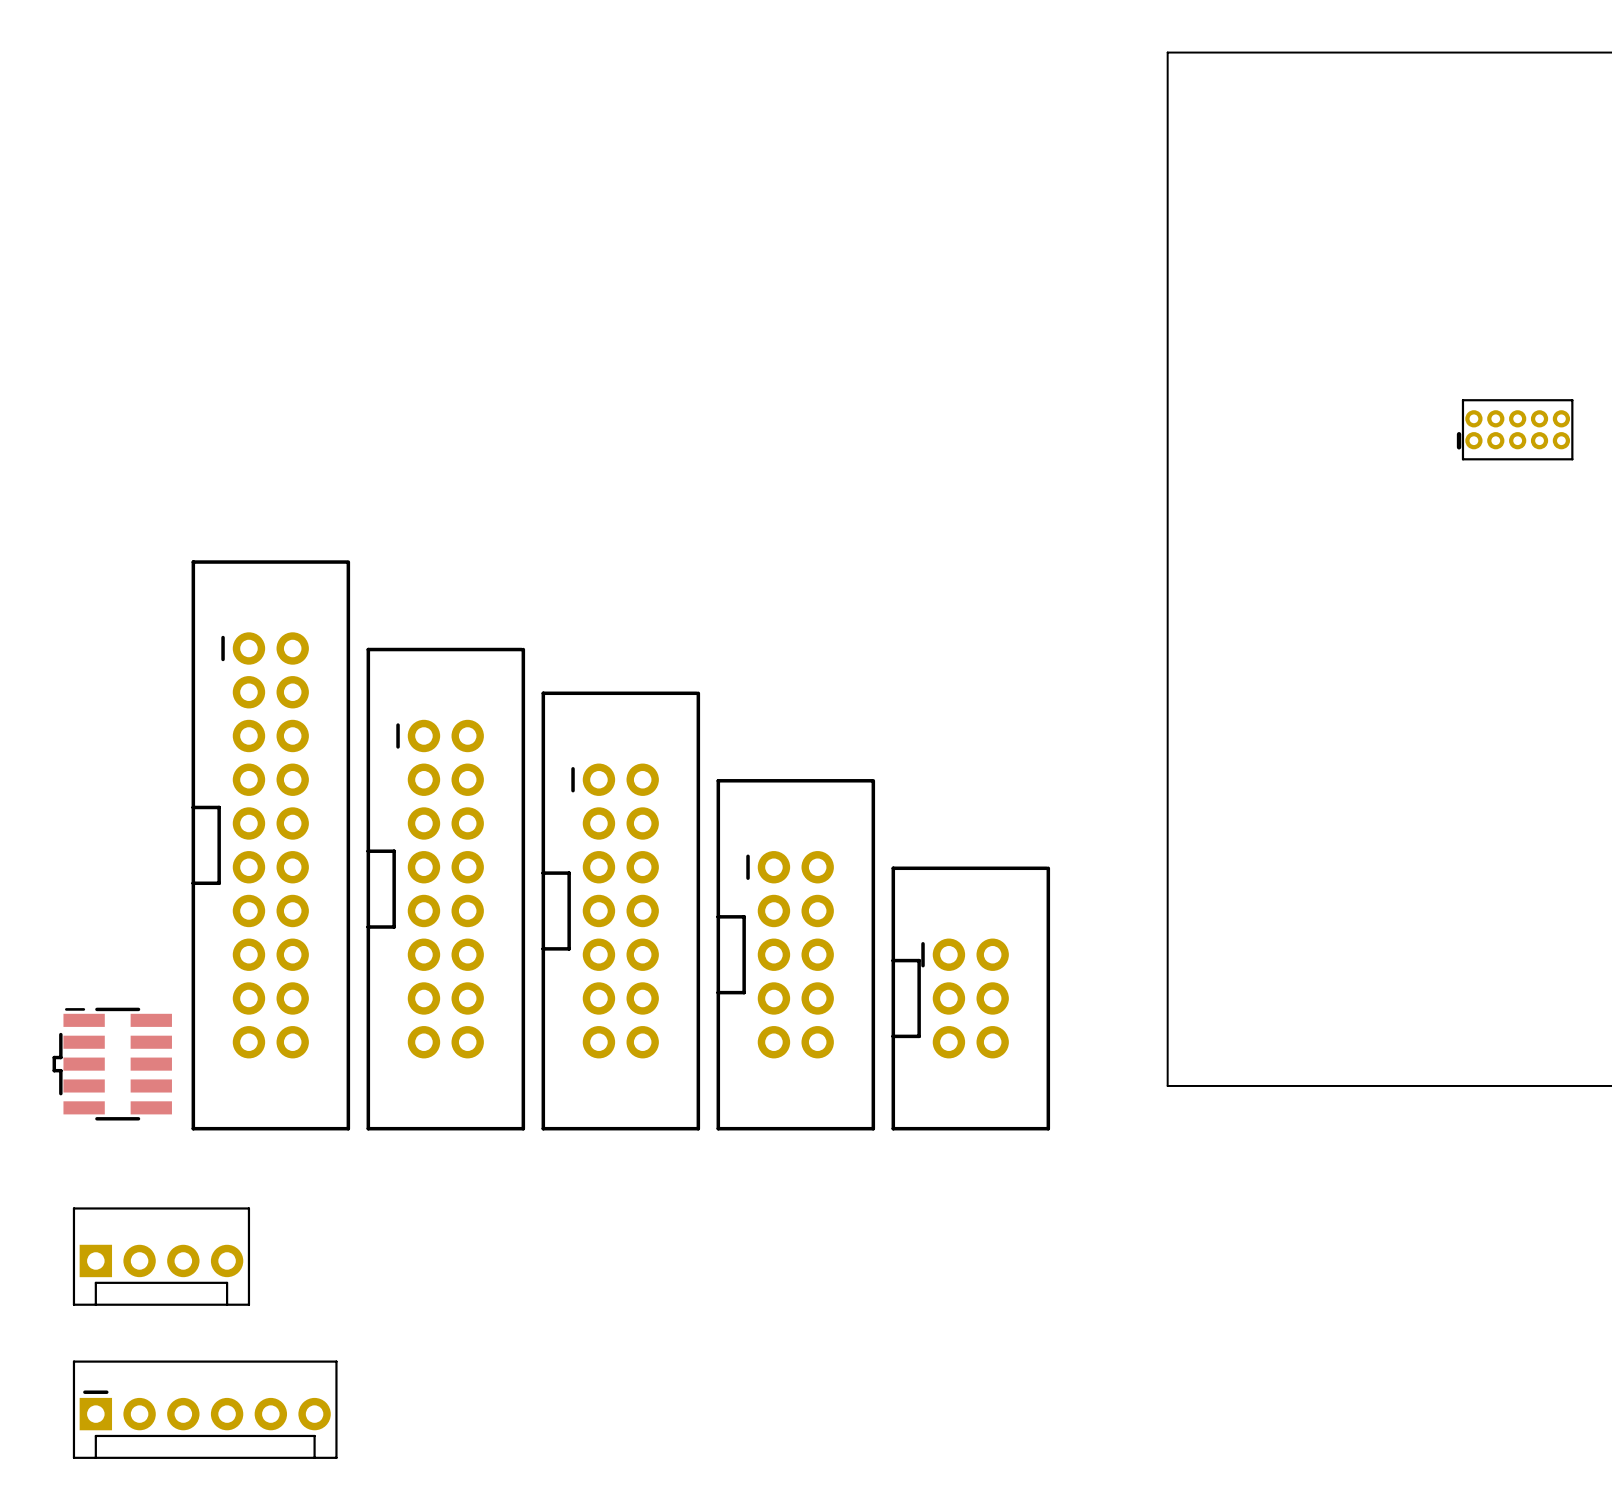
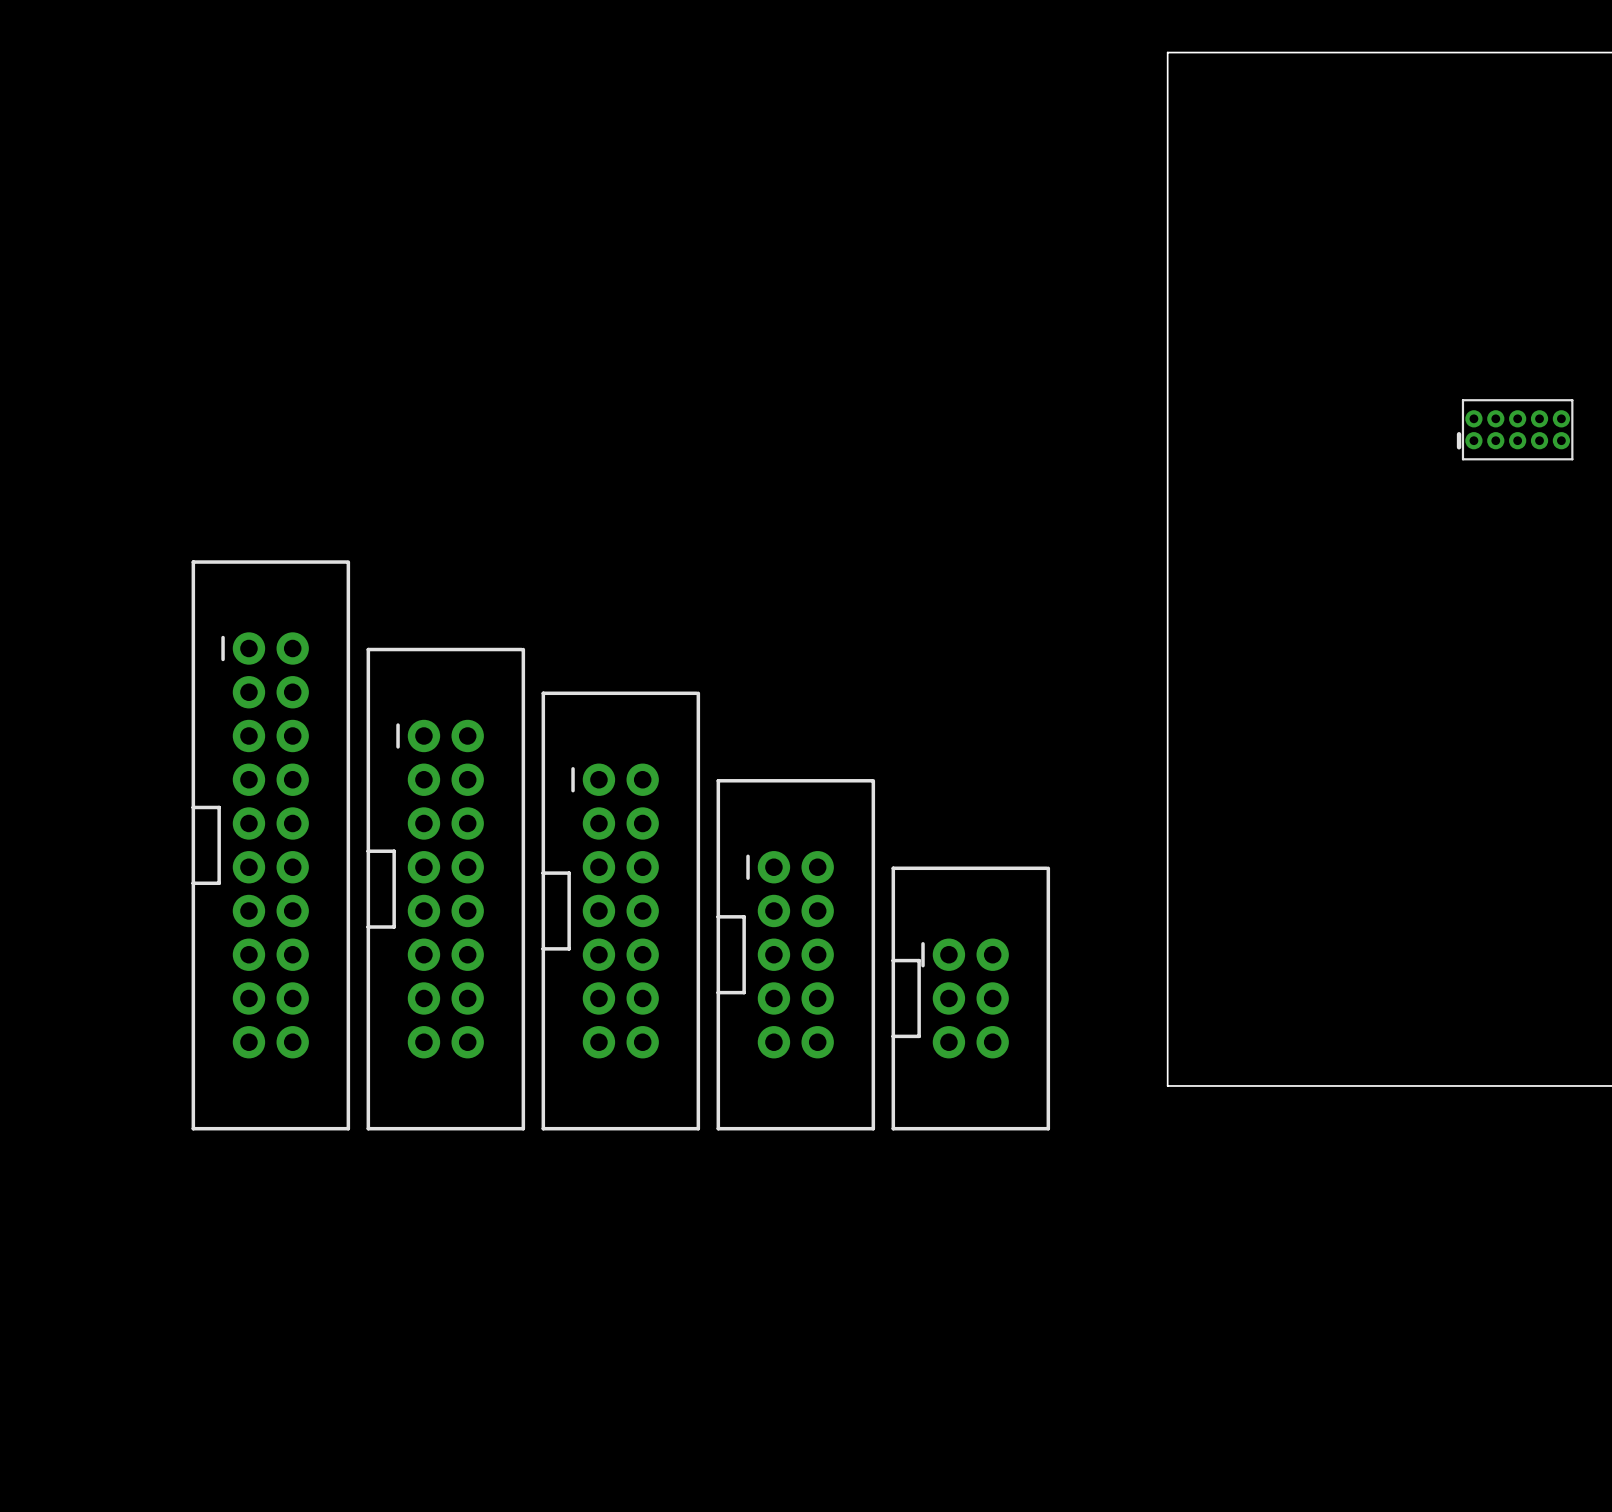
part: (112, 1064) -> none
part: (161, 1256) -> none
part: (205, 1409) -> none

